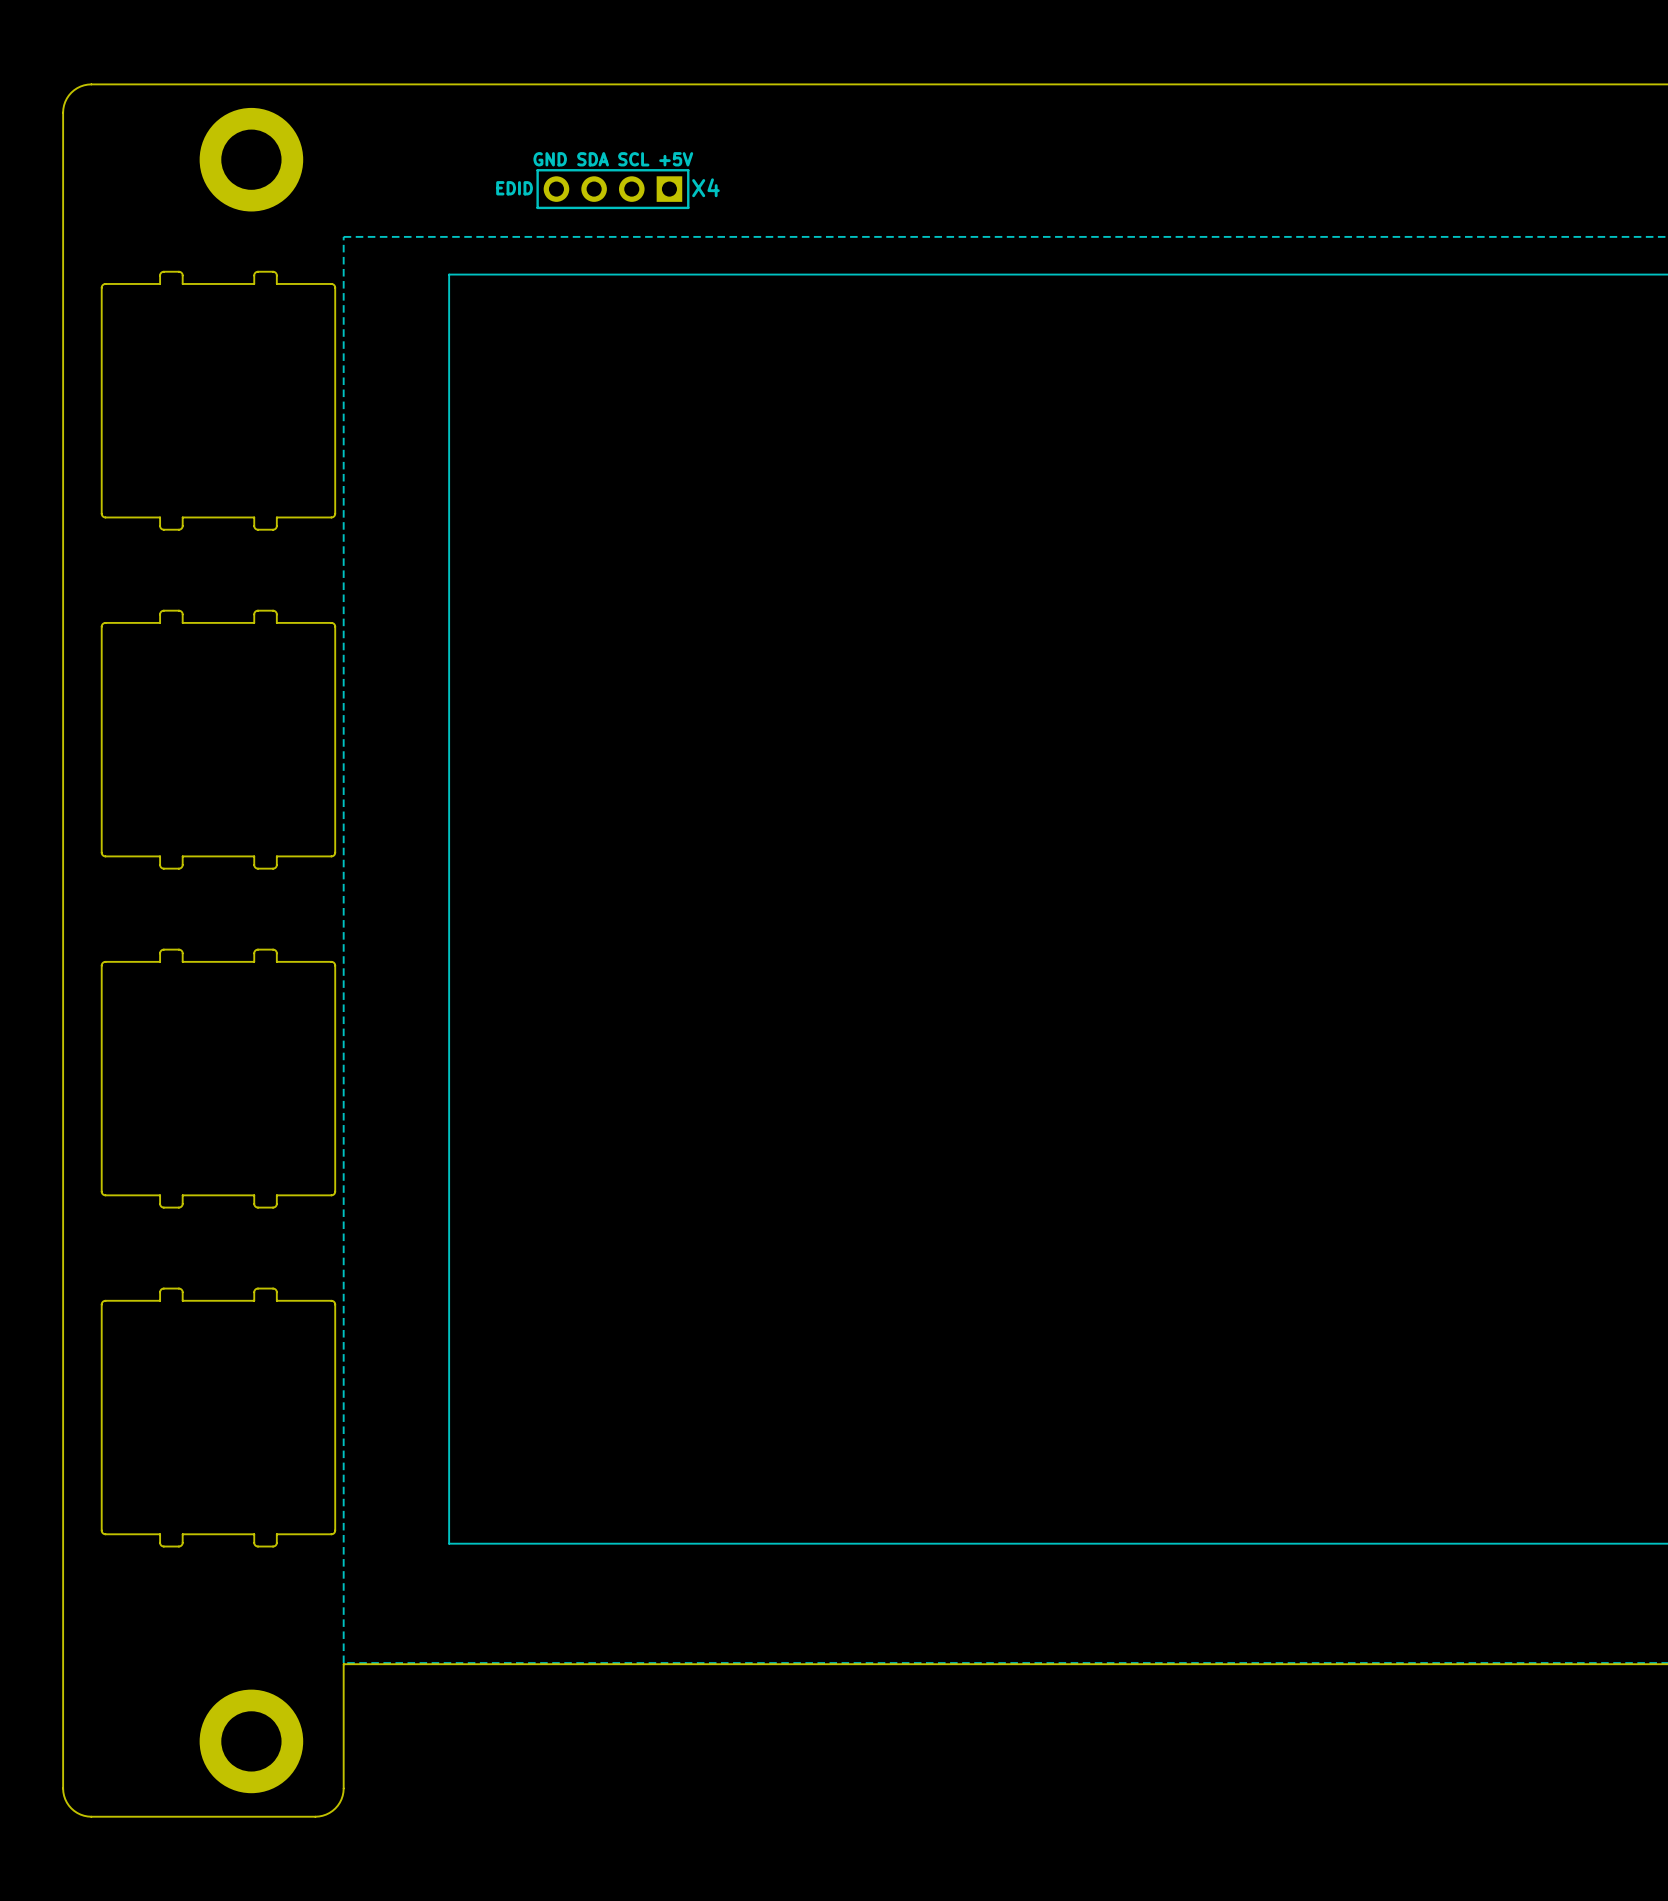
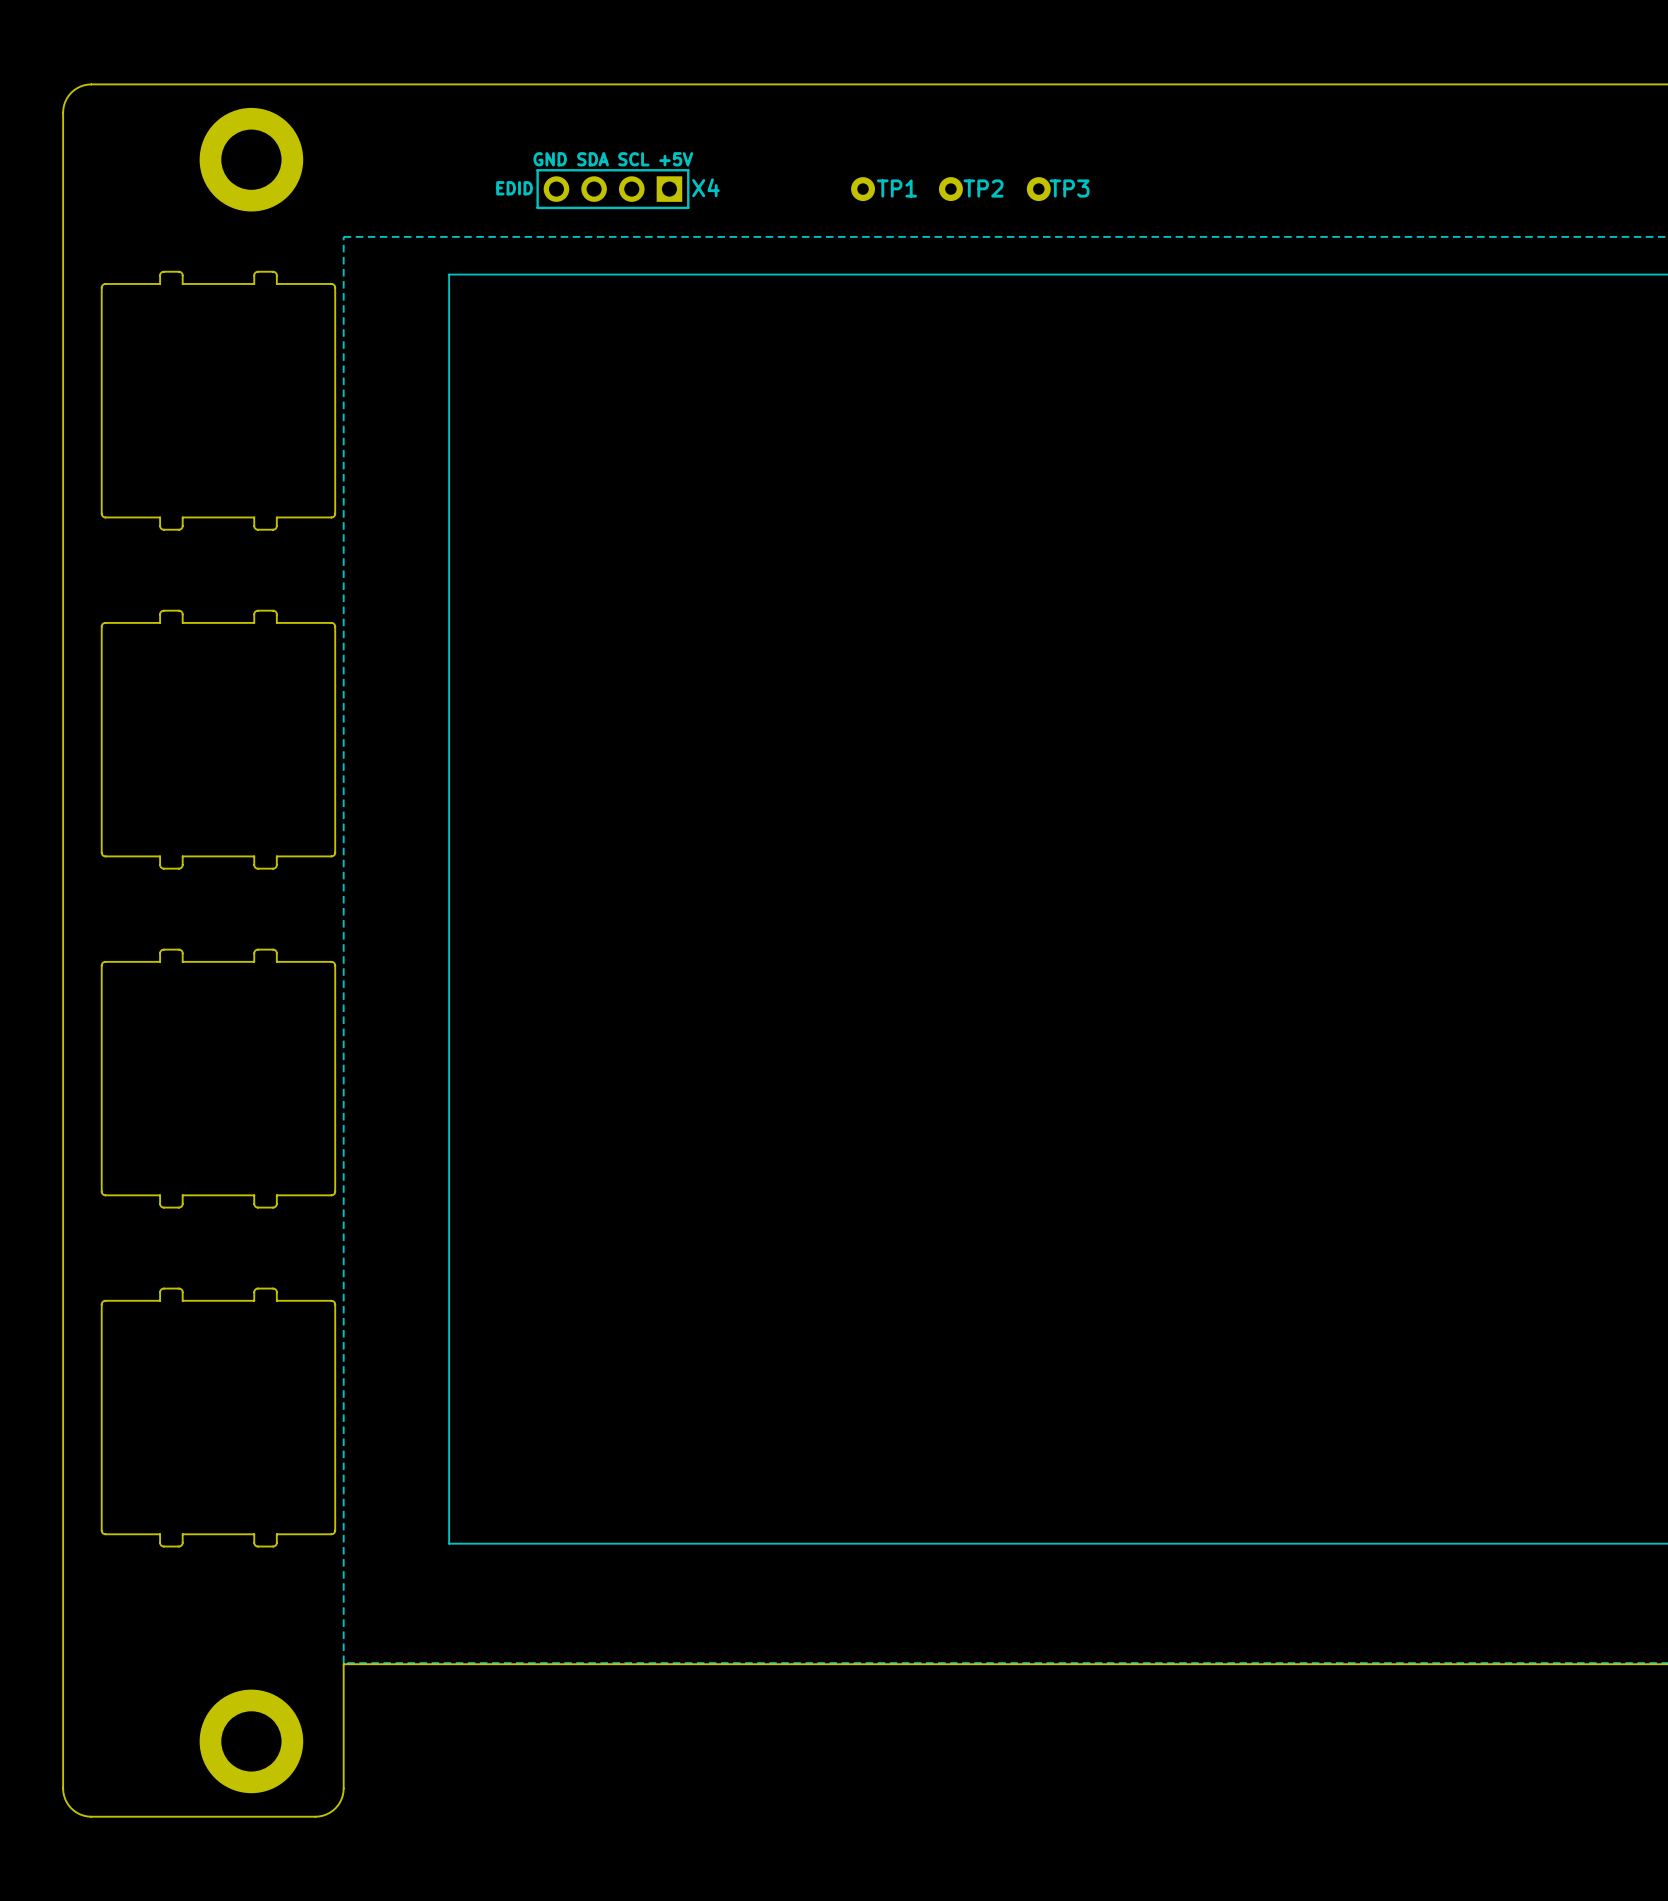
TP1: none -> (863, 189)
TP2: none -> (950, 189)
TP3: none -> (1038, 189)

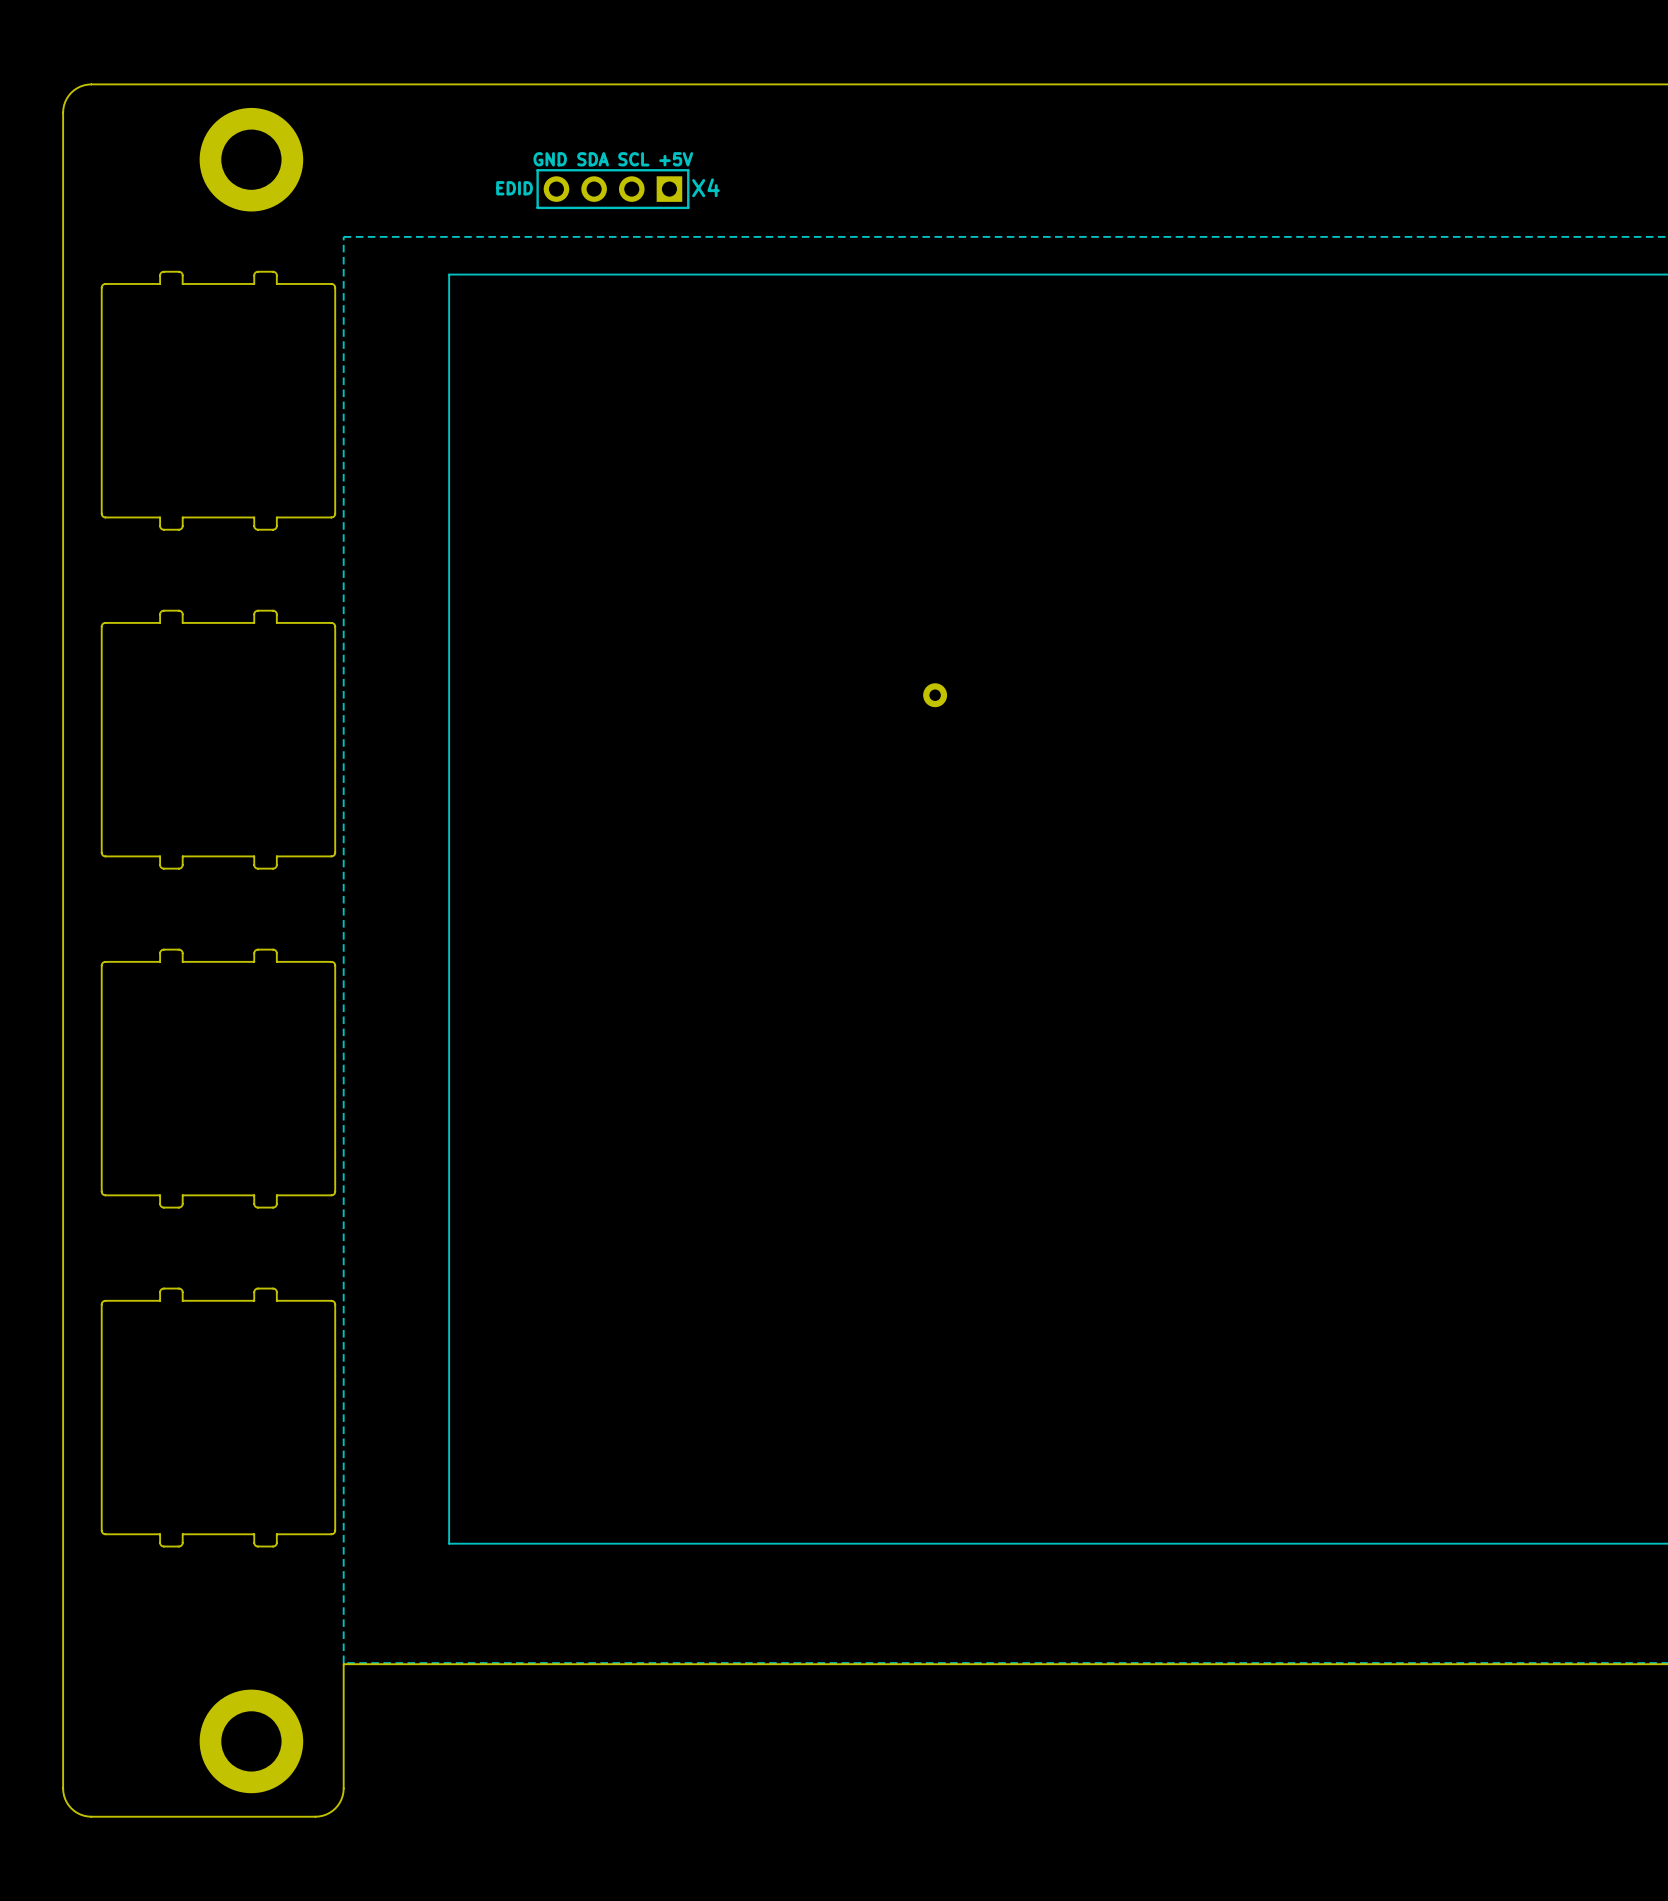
TP1: (863, 189) -> none
TP2: (950, 189) -> none
TP3: (1038, 189) -> none
part: none -> (935, 695)

